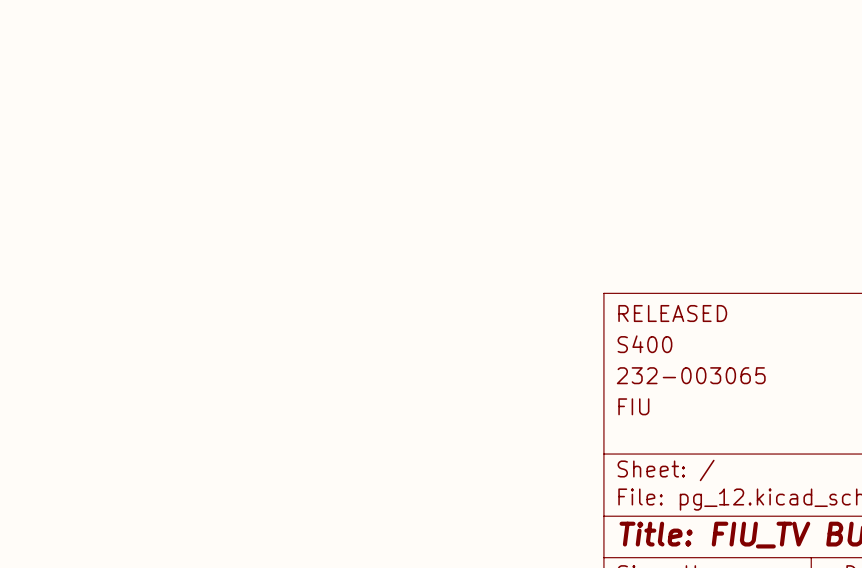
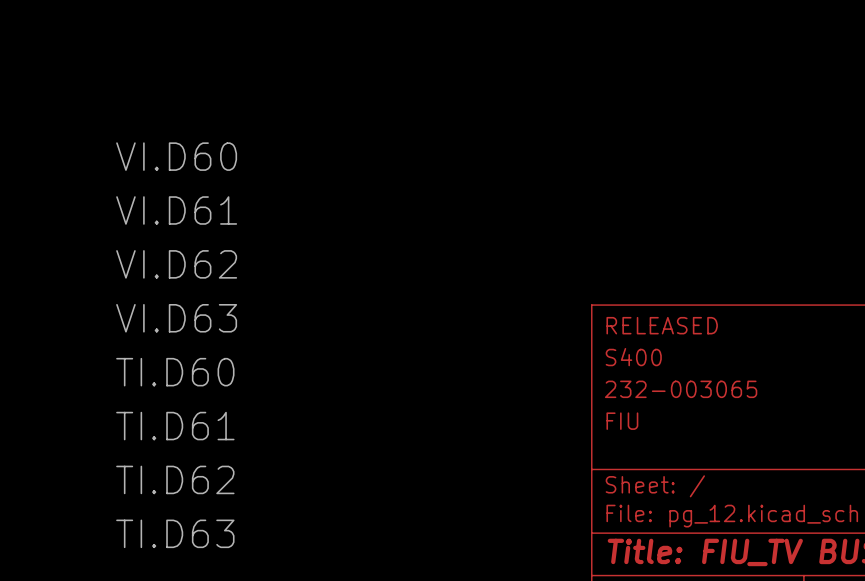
label: none -> VI.D60 (176, 156)
label: none -> VI.D61 (176, 210)
label: none -> VI.D62 (176, 264)
label: none -> VI.D63 (176, 318)
label: none -> TI.D60 (175, 372)
label: none -> TI.D61 (175, 426)
label: none -> TI.D62 (175, 479)
label: none -> TI.D63 (175, 533)

